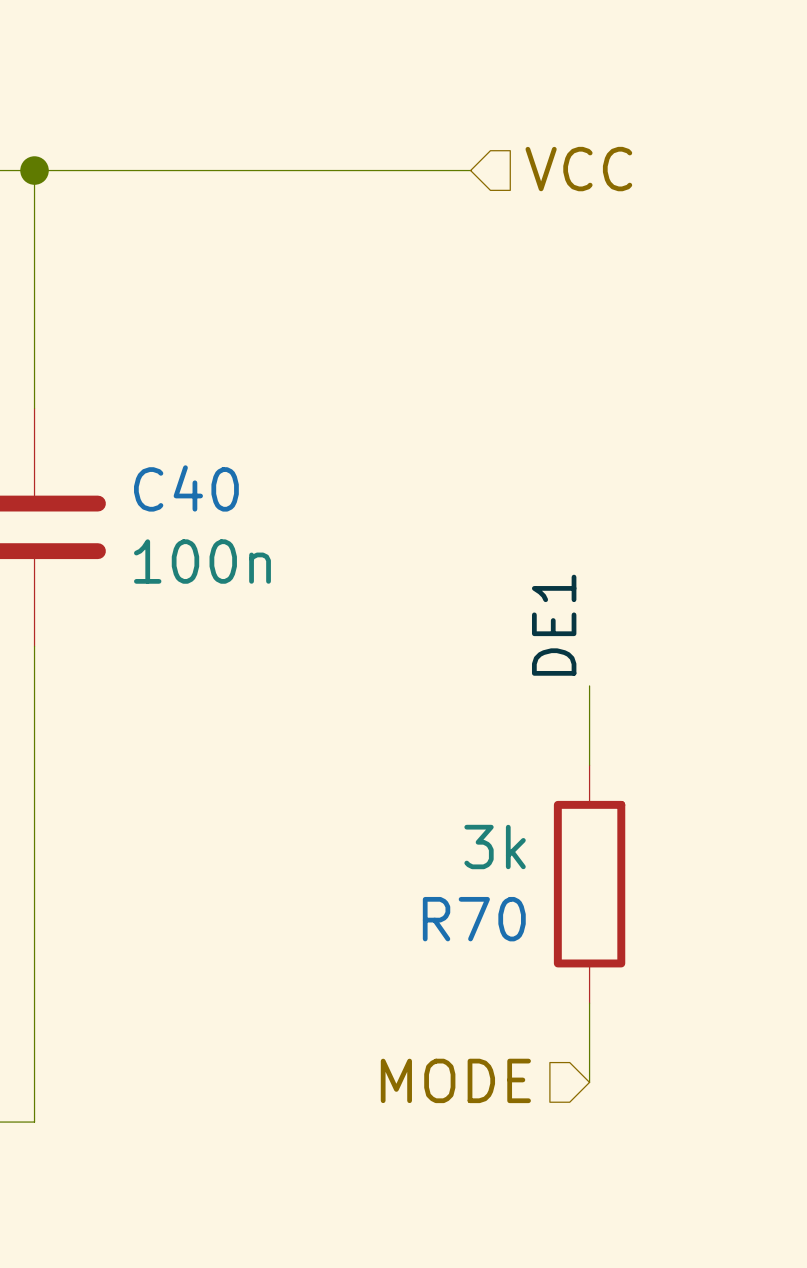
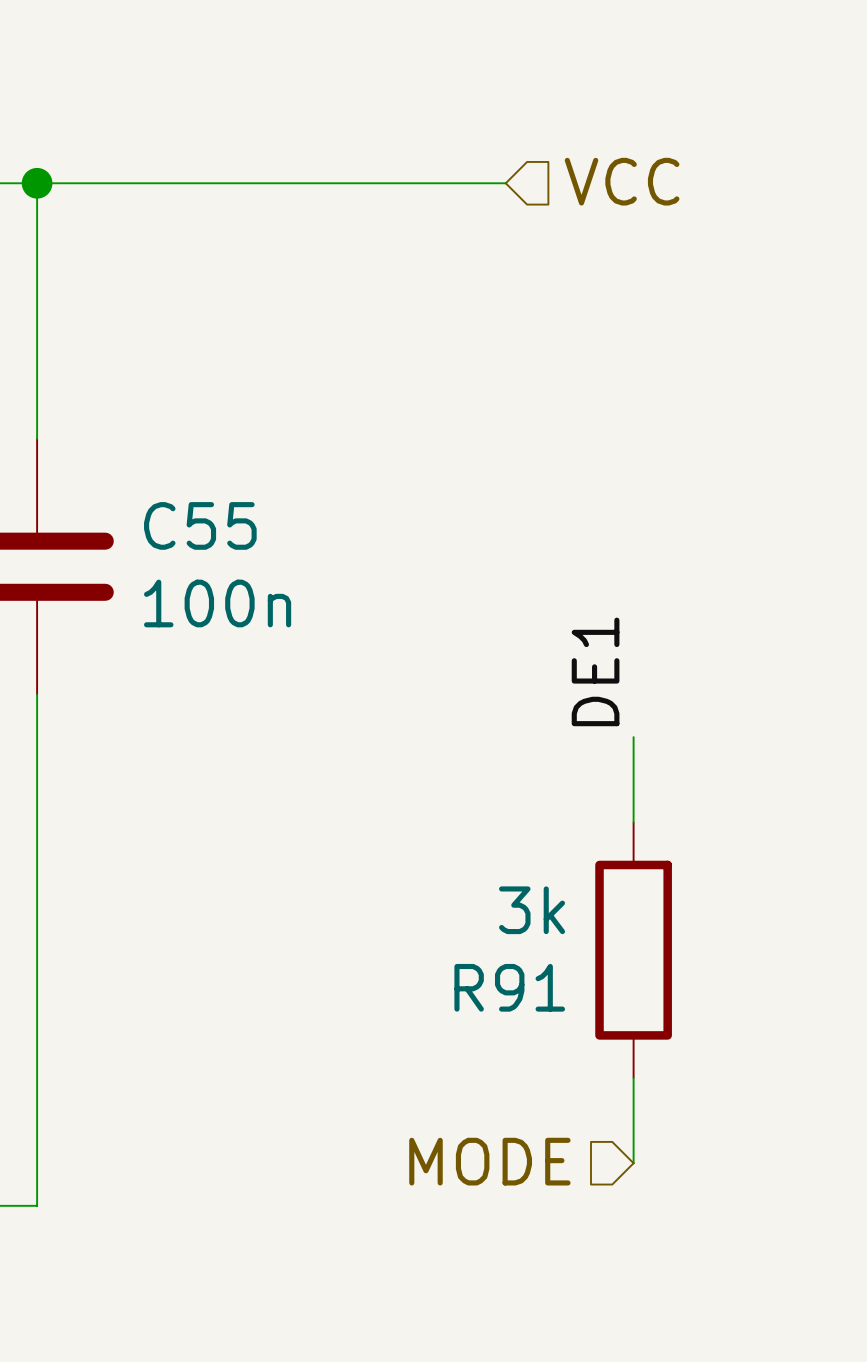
C40 name: C40 (186, 488) -> C55 (200, 525)
R70 name: R70 (474, 919) -> R91 (509, 987)

